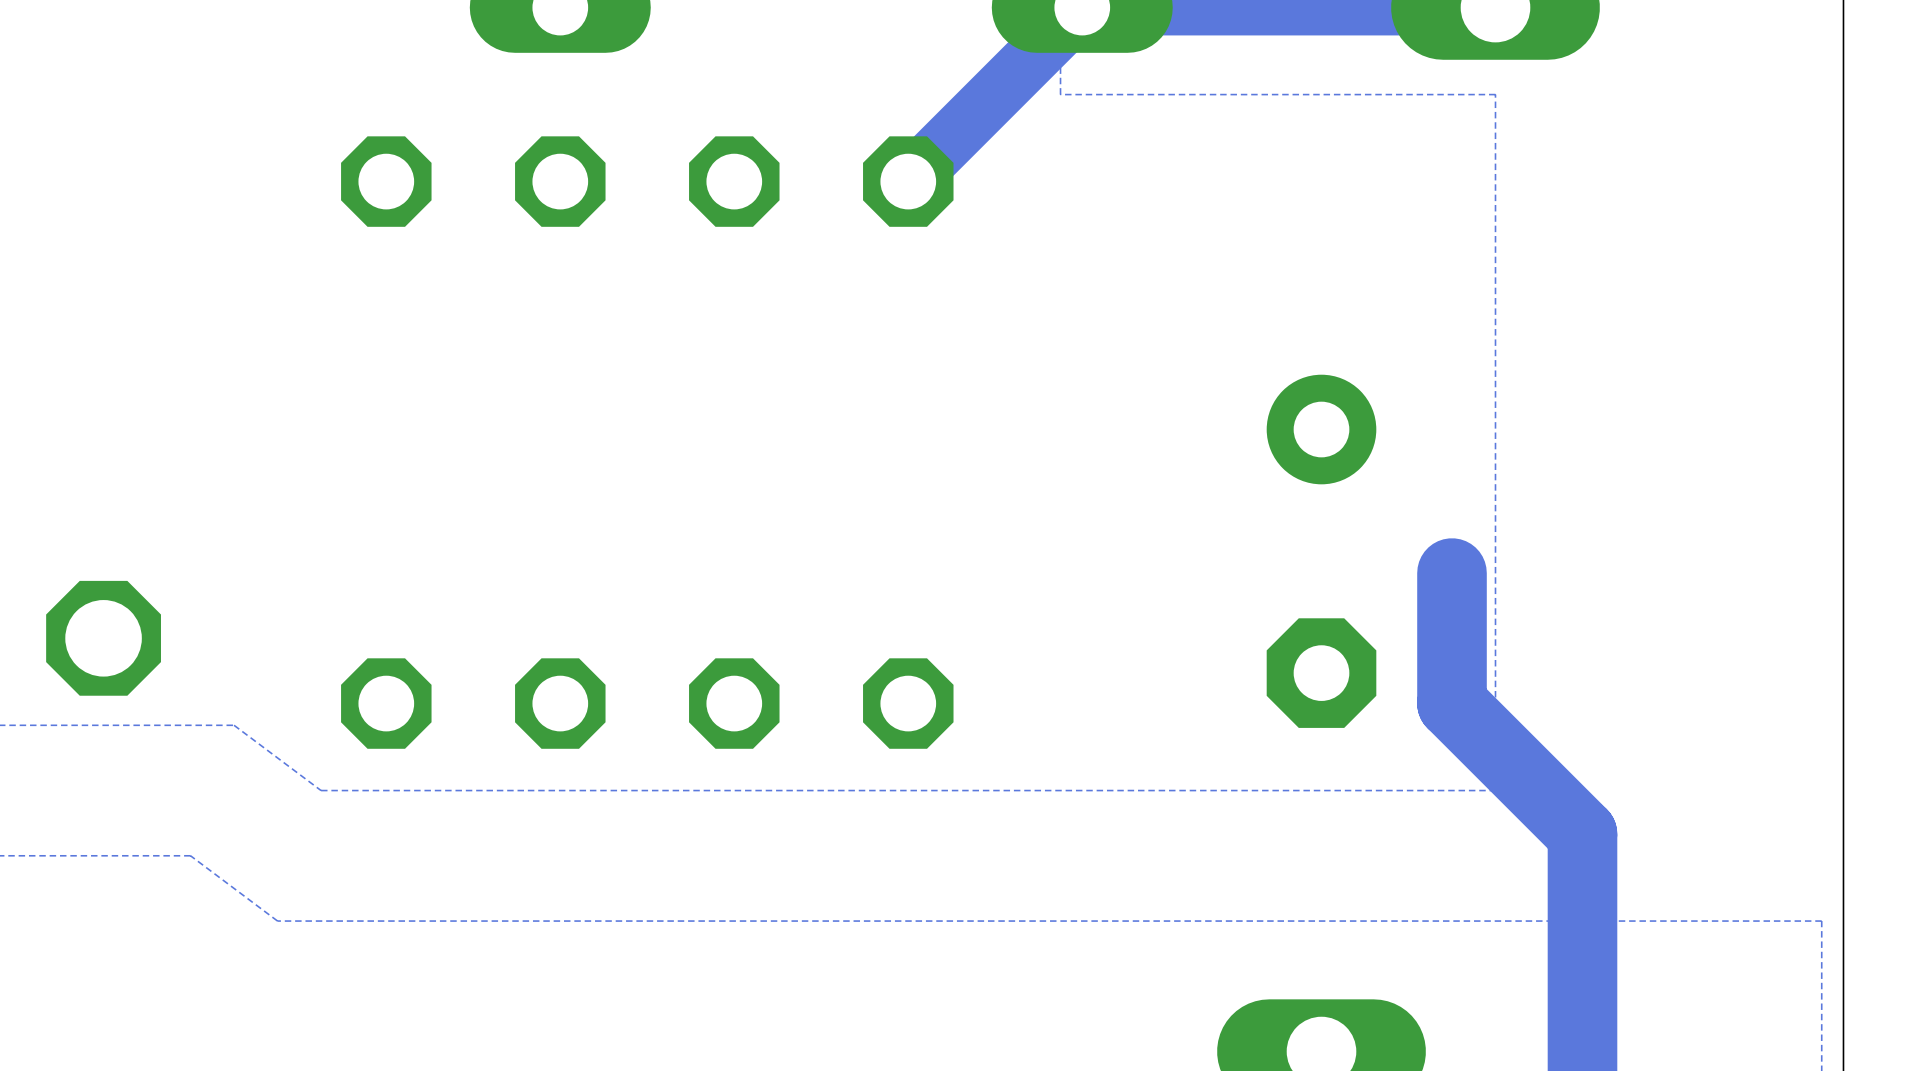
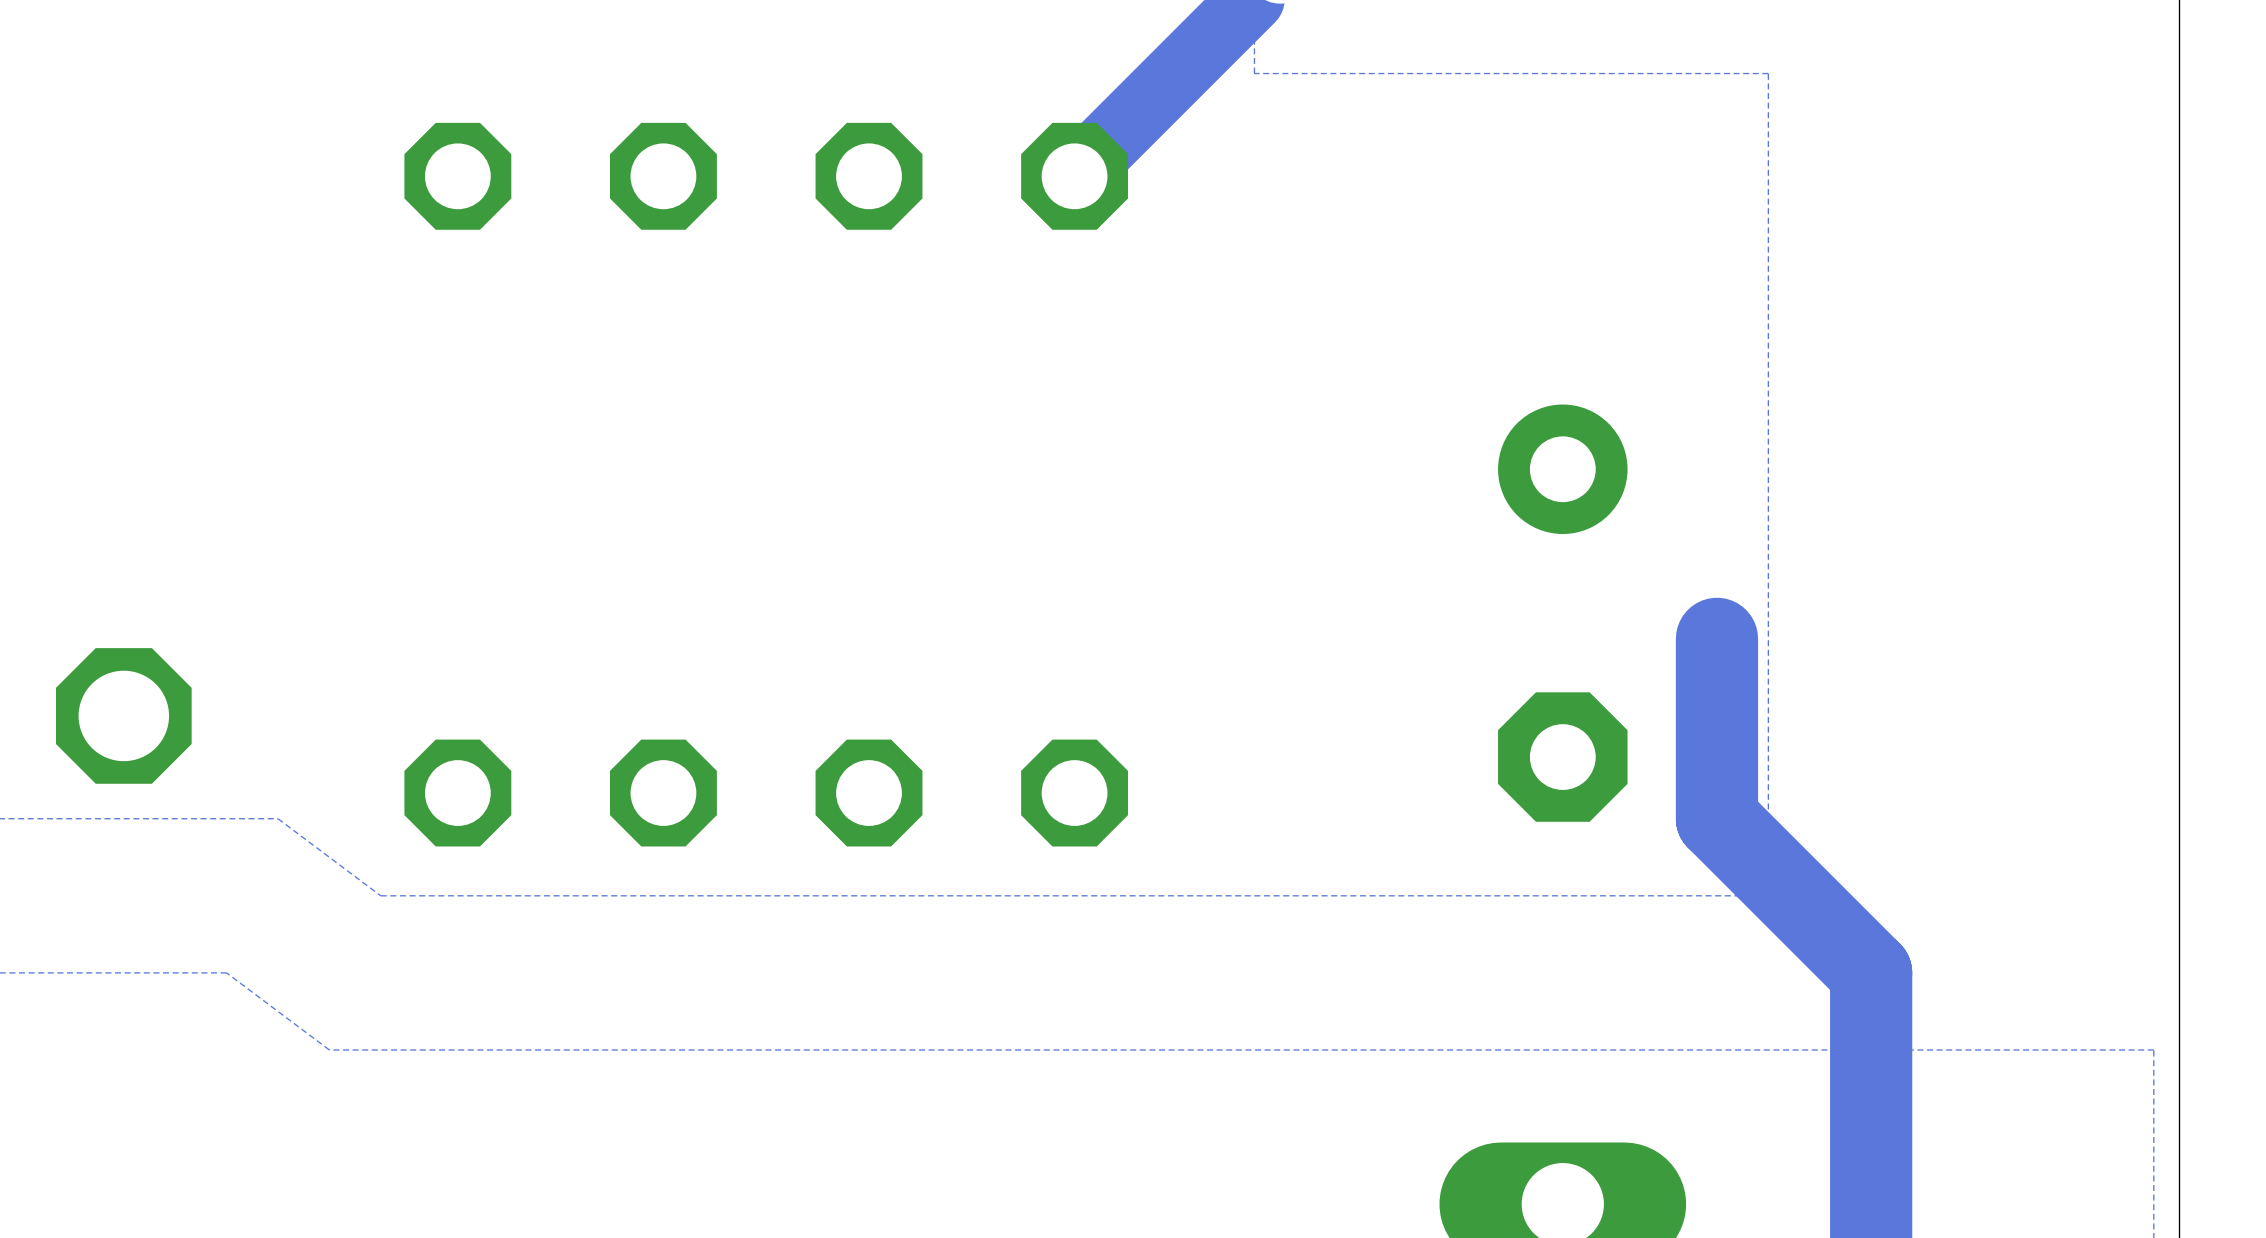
track: (1452, 703) (1582, 834) (1582, 855) -> (1716, 793) (1716, 818) (1871, 972)

